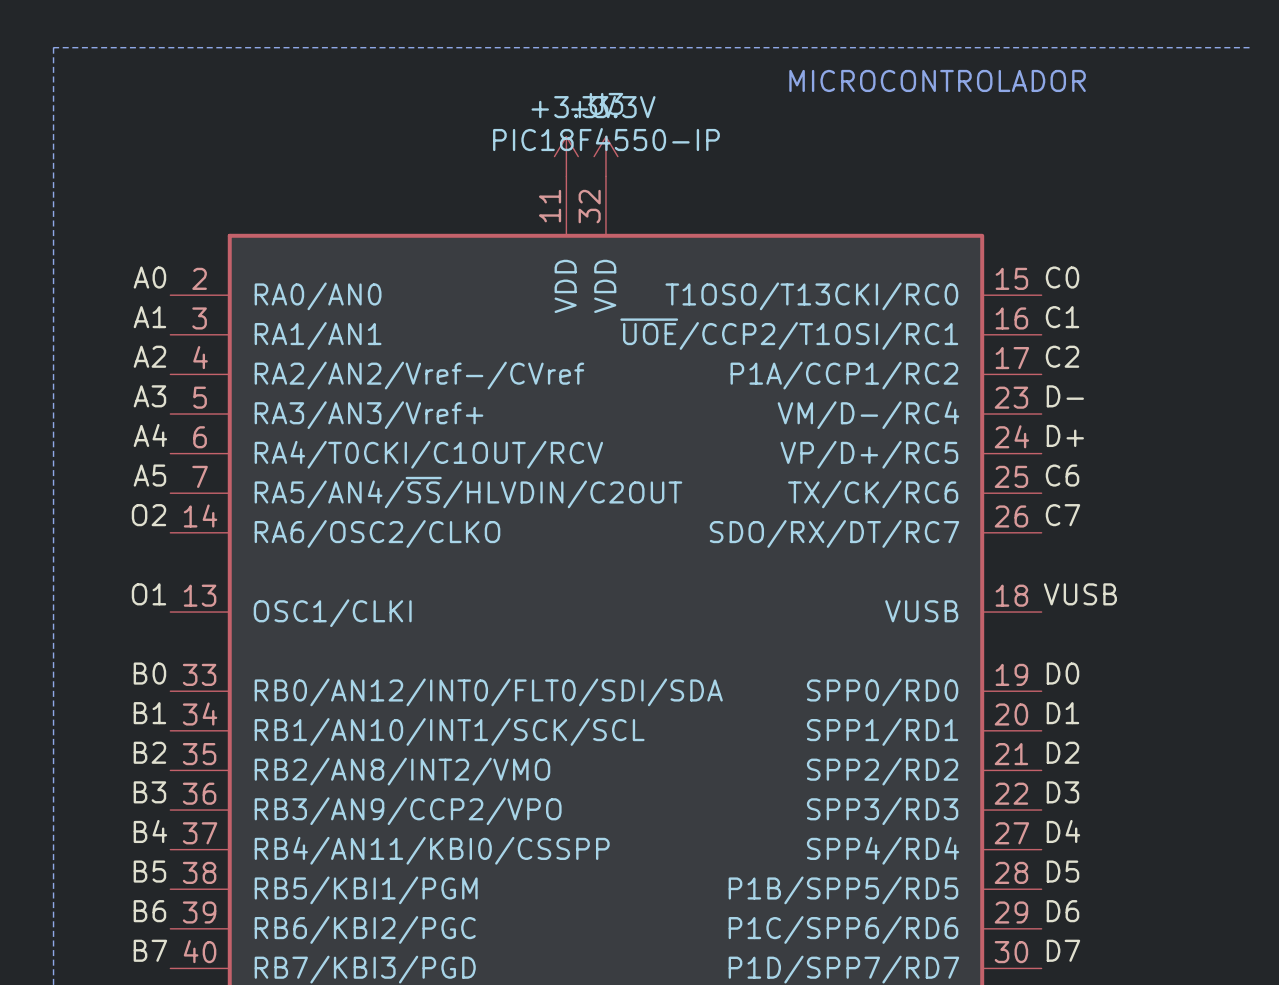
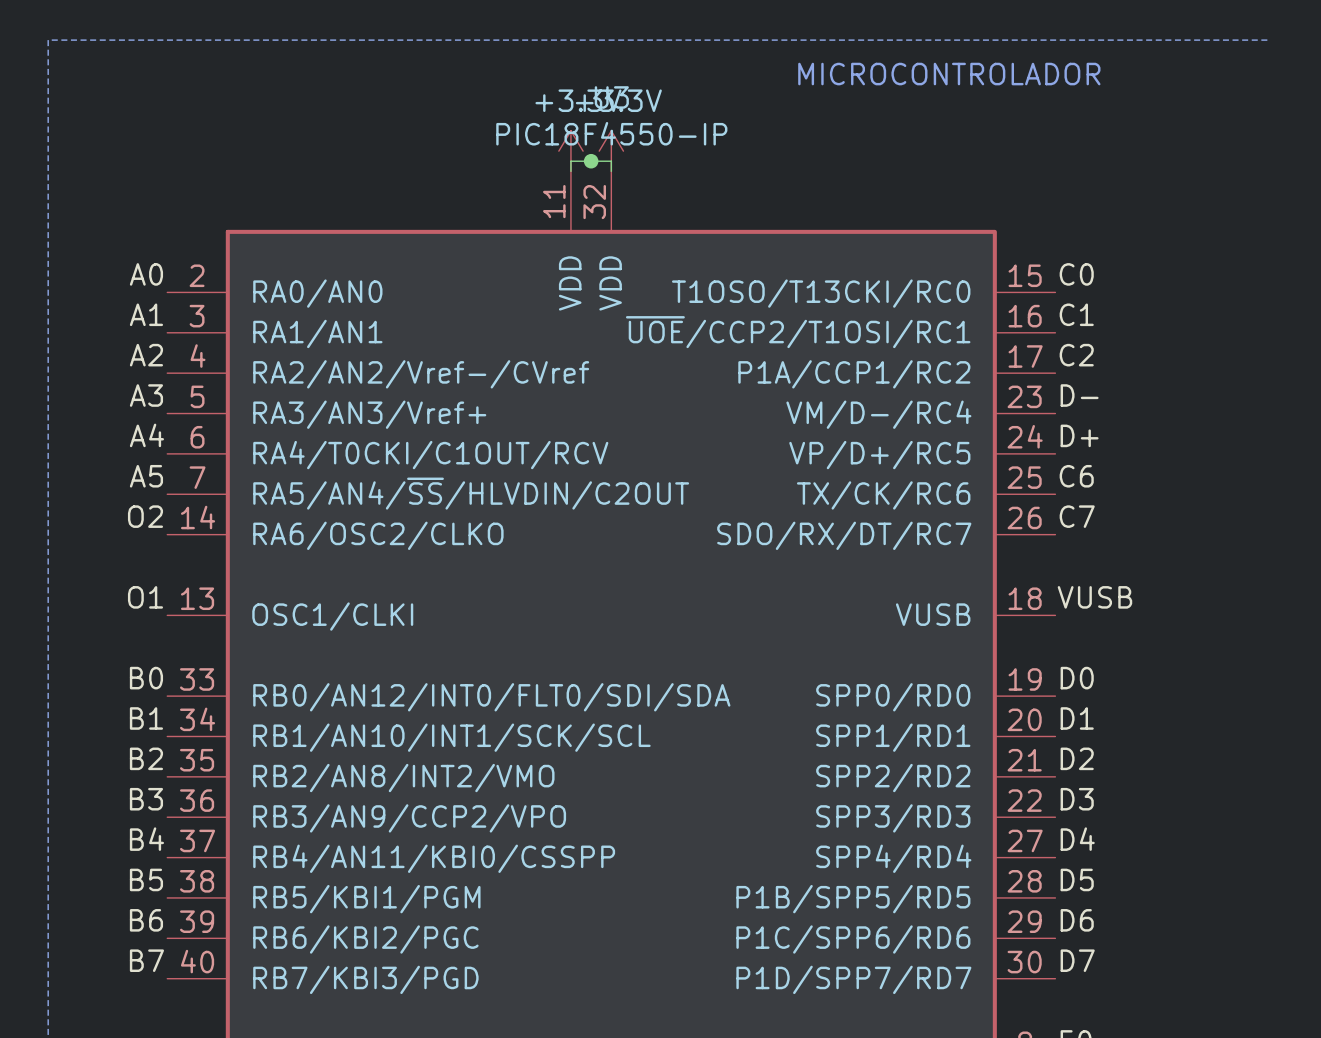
junction: none -> (591, 161)
wire: none -> (570, 171) (570, 161) (611, 161) (611, 171)

